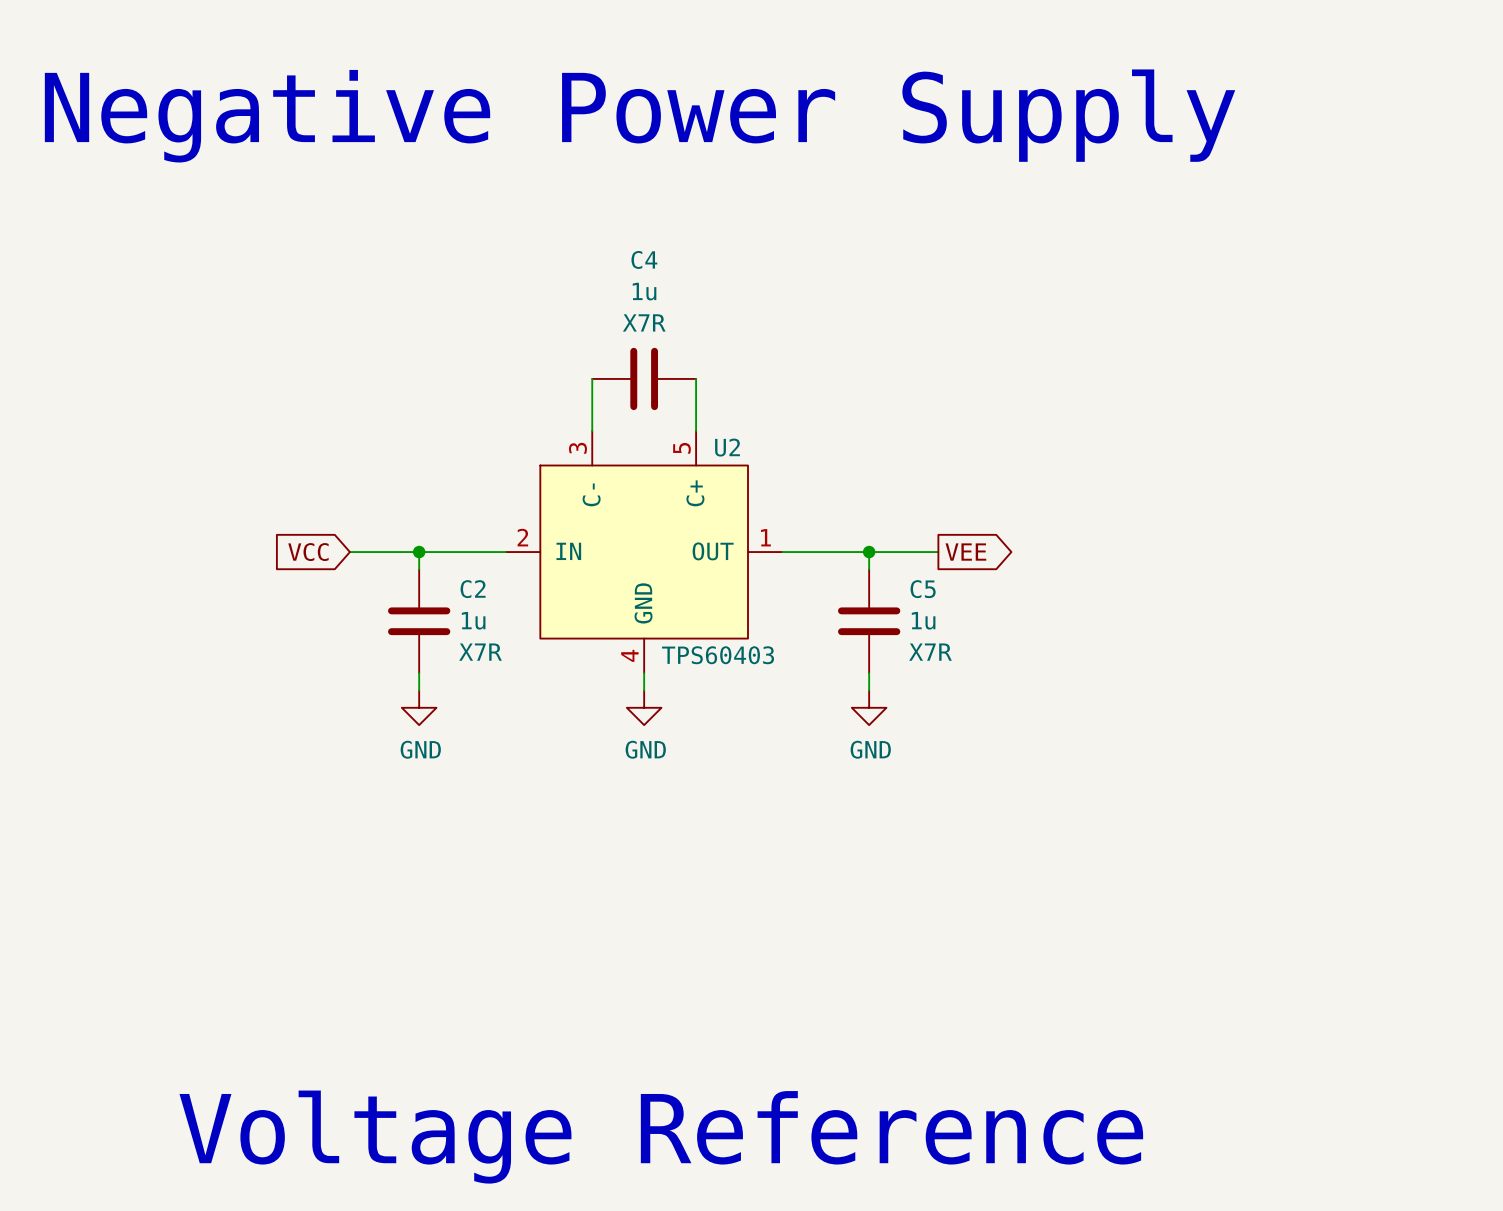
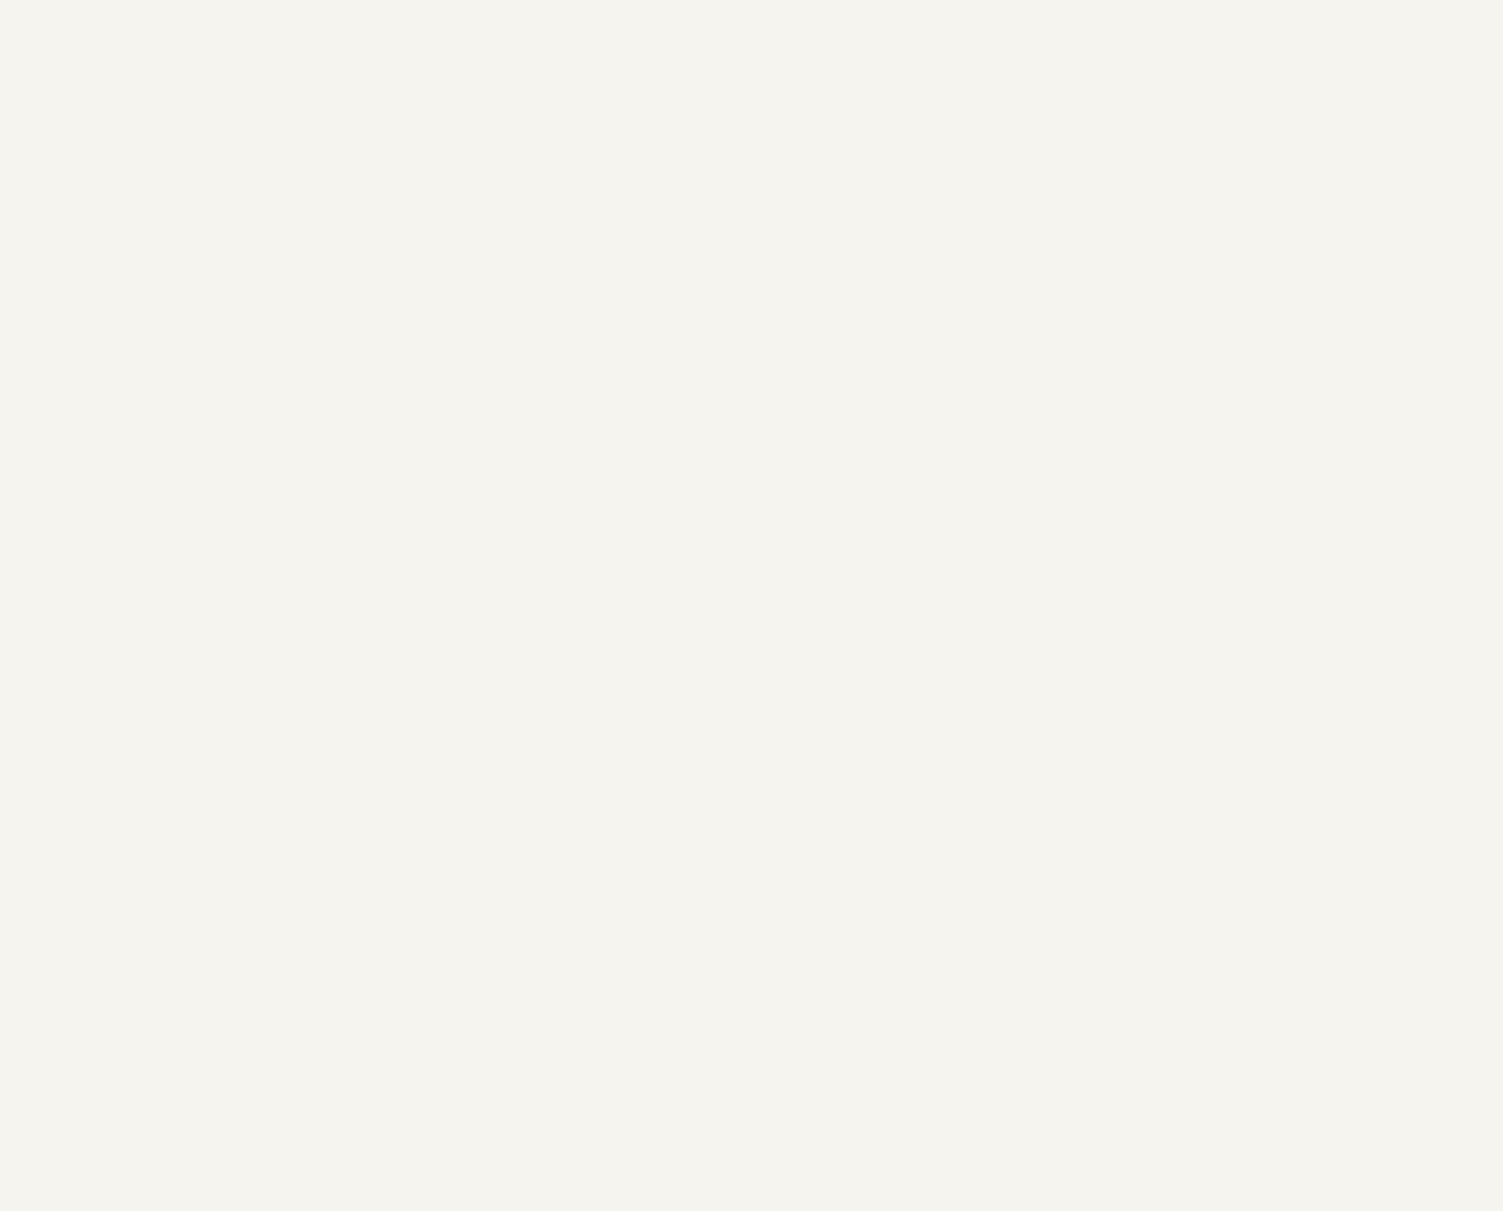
text: Negative Power Supply (640, 115) -> none
wire: (592, 378) (592, 430) -> none
C4: 1u (644, 378) -> none
wire: (696, 378) (696, 430) -> none
global label: VCC (308, 552) -> none
wire: (349, 552) (505, 552) -> none
wire: (419, 552) (419, 569) -> none
junction: (419, 552) -> none
U2: TPS60403 (644, 552) -> none
wire: (782, 552) (938, 552) -> none
wire: (869, 552) (869, 569) -> none
junction: (869, 552) -> none
global label: VEE (965, 552) -> none
C2: 1u (419, 621) -> none
C5: 1u (869, 621) -> none
wire: (419, 673) (419, 690) -> none
wire: (644, 673) (644, 690) -> none
wire: (869, 673) (869, 690) -> none
power symbol: GND (419, 707) -> none
power symbol: GND (644, 707) -> none
power symbol: GND (869, 707) -> none
text: Voltage Reference (661, 1137) -> none

